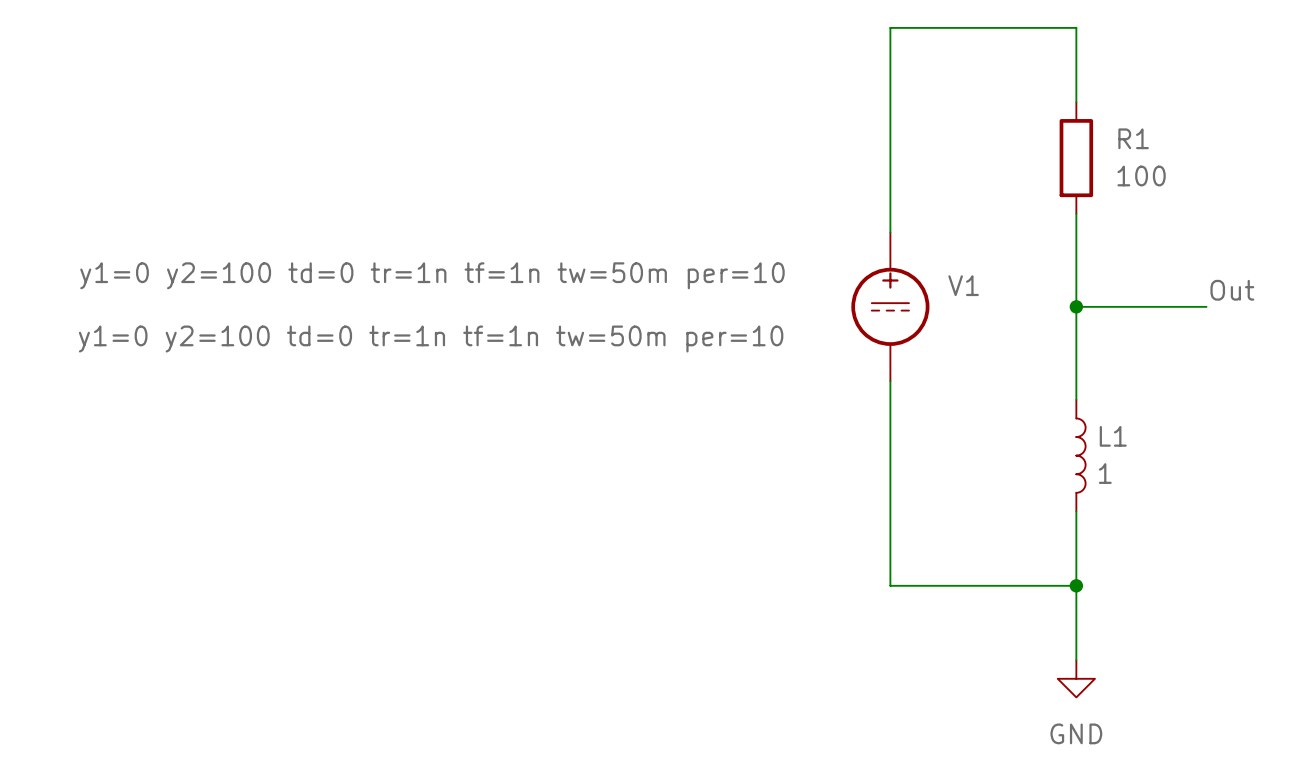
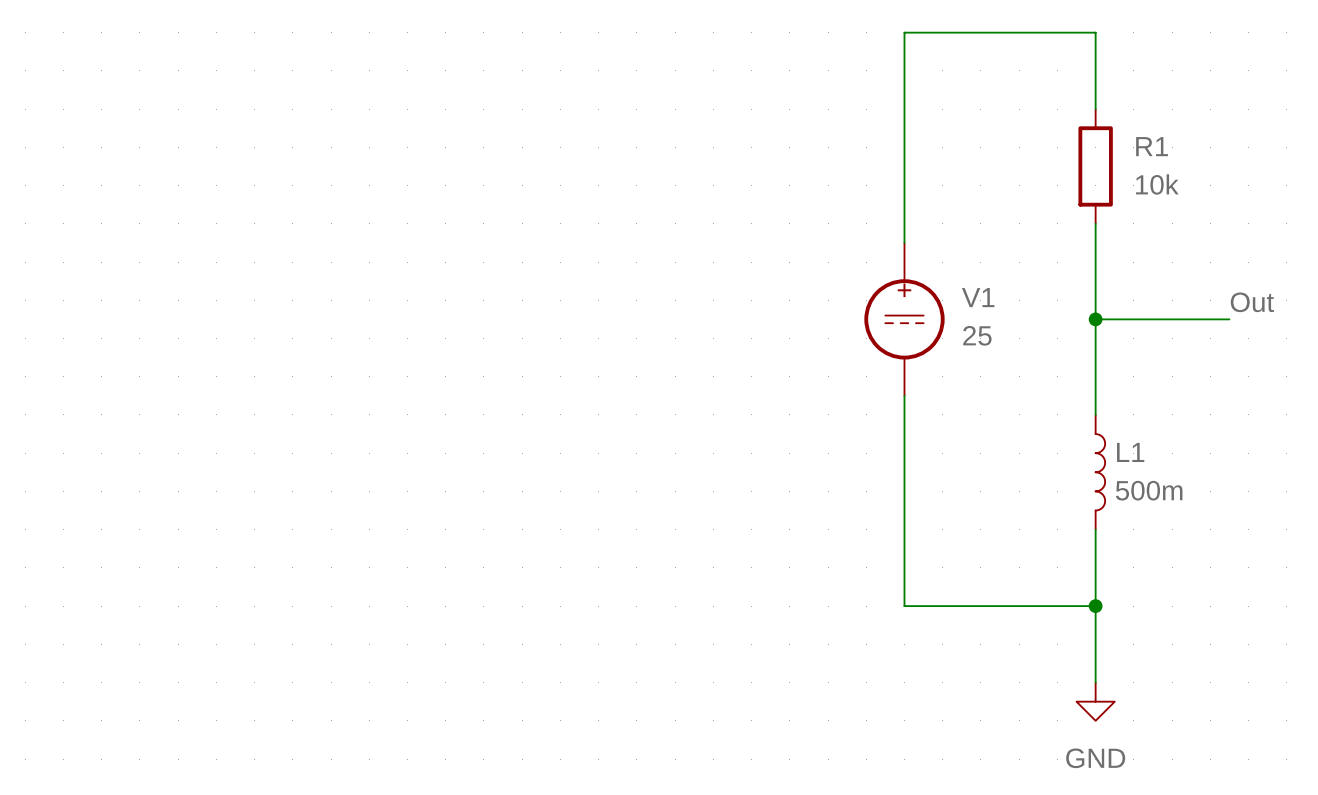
R1 value: 100 (1141, 175) -> 10k (1157, 184)
V1 text: y1=0 y2=100 td=0 tr=1n tf=1n tw=50m per=10 (432, 275) -> none
V1 value: y1=0 y2=100 td=0 tr=1n tf=1n tw=50m per=10 (431, 339) -> 25 (977, 335)
L1 value: 1 (1105, 473) -> 500m (1149, 490)

